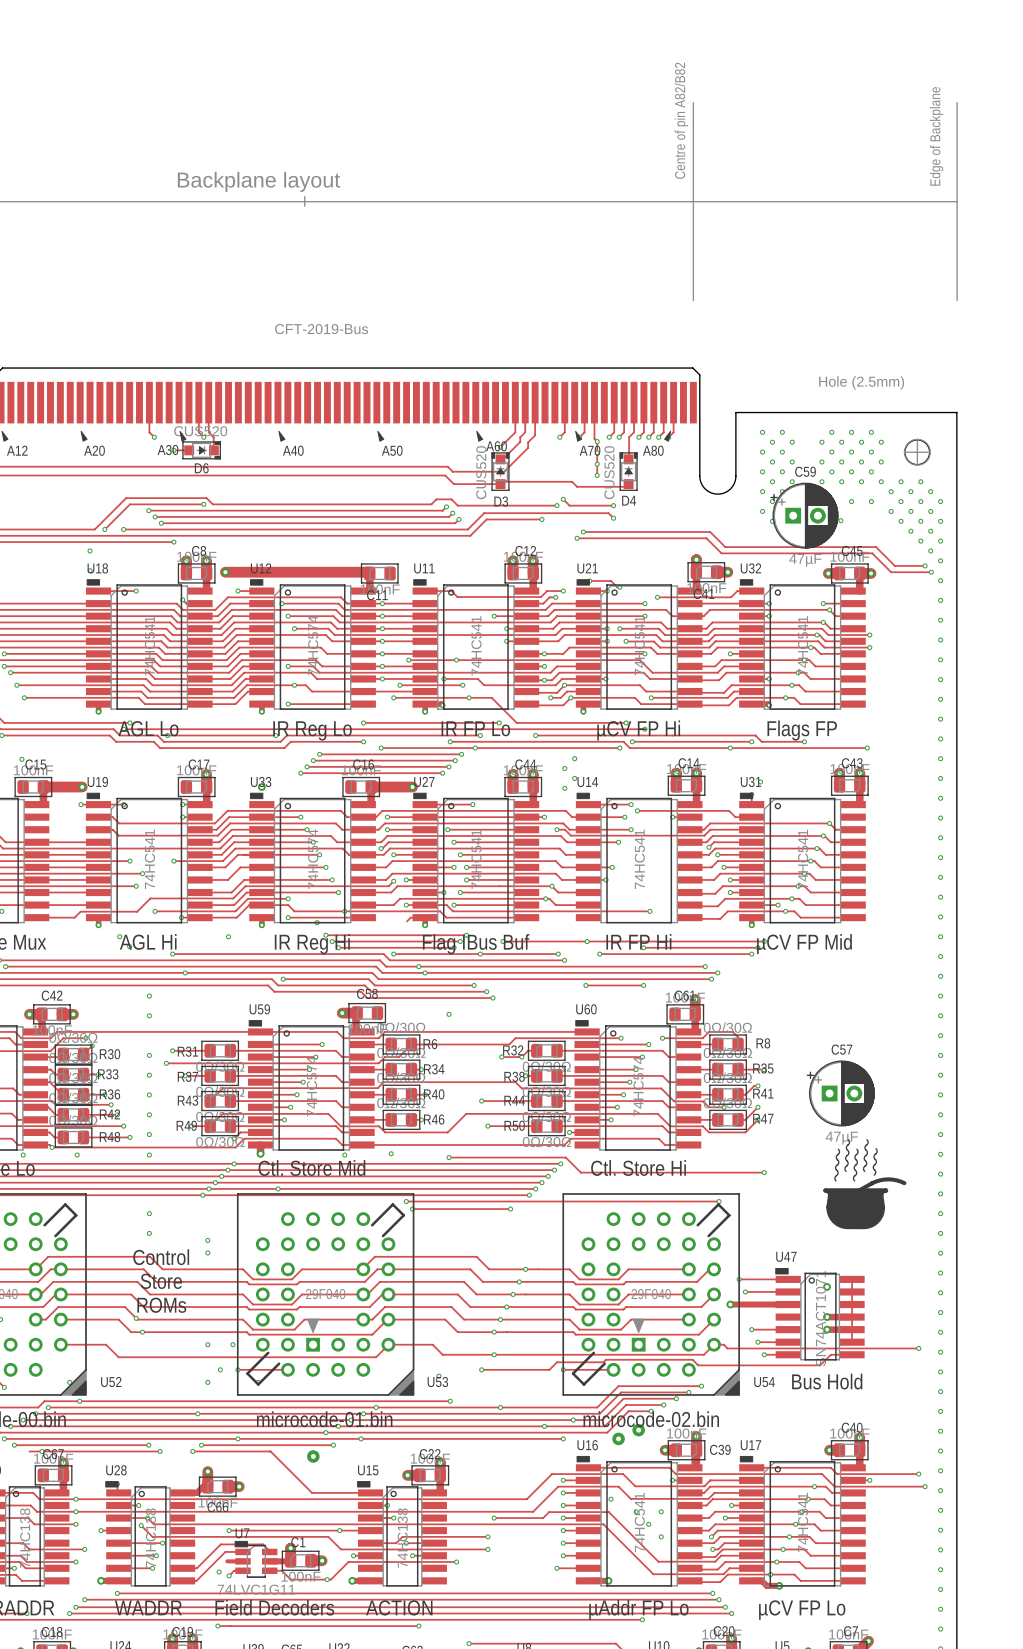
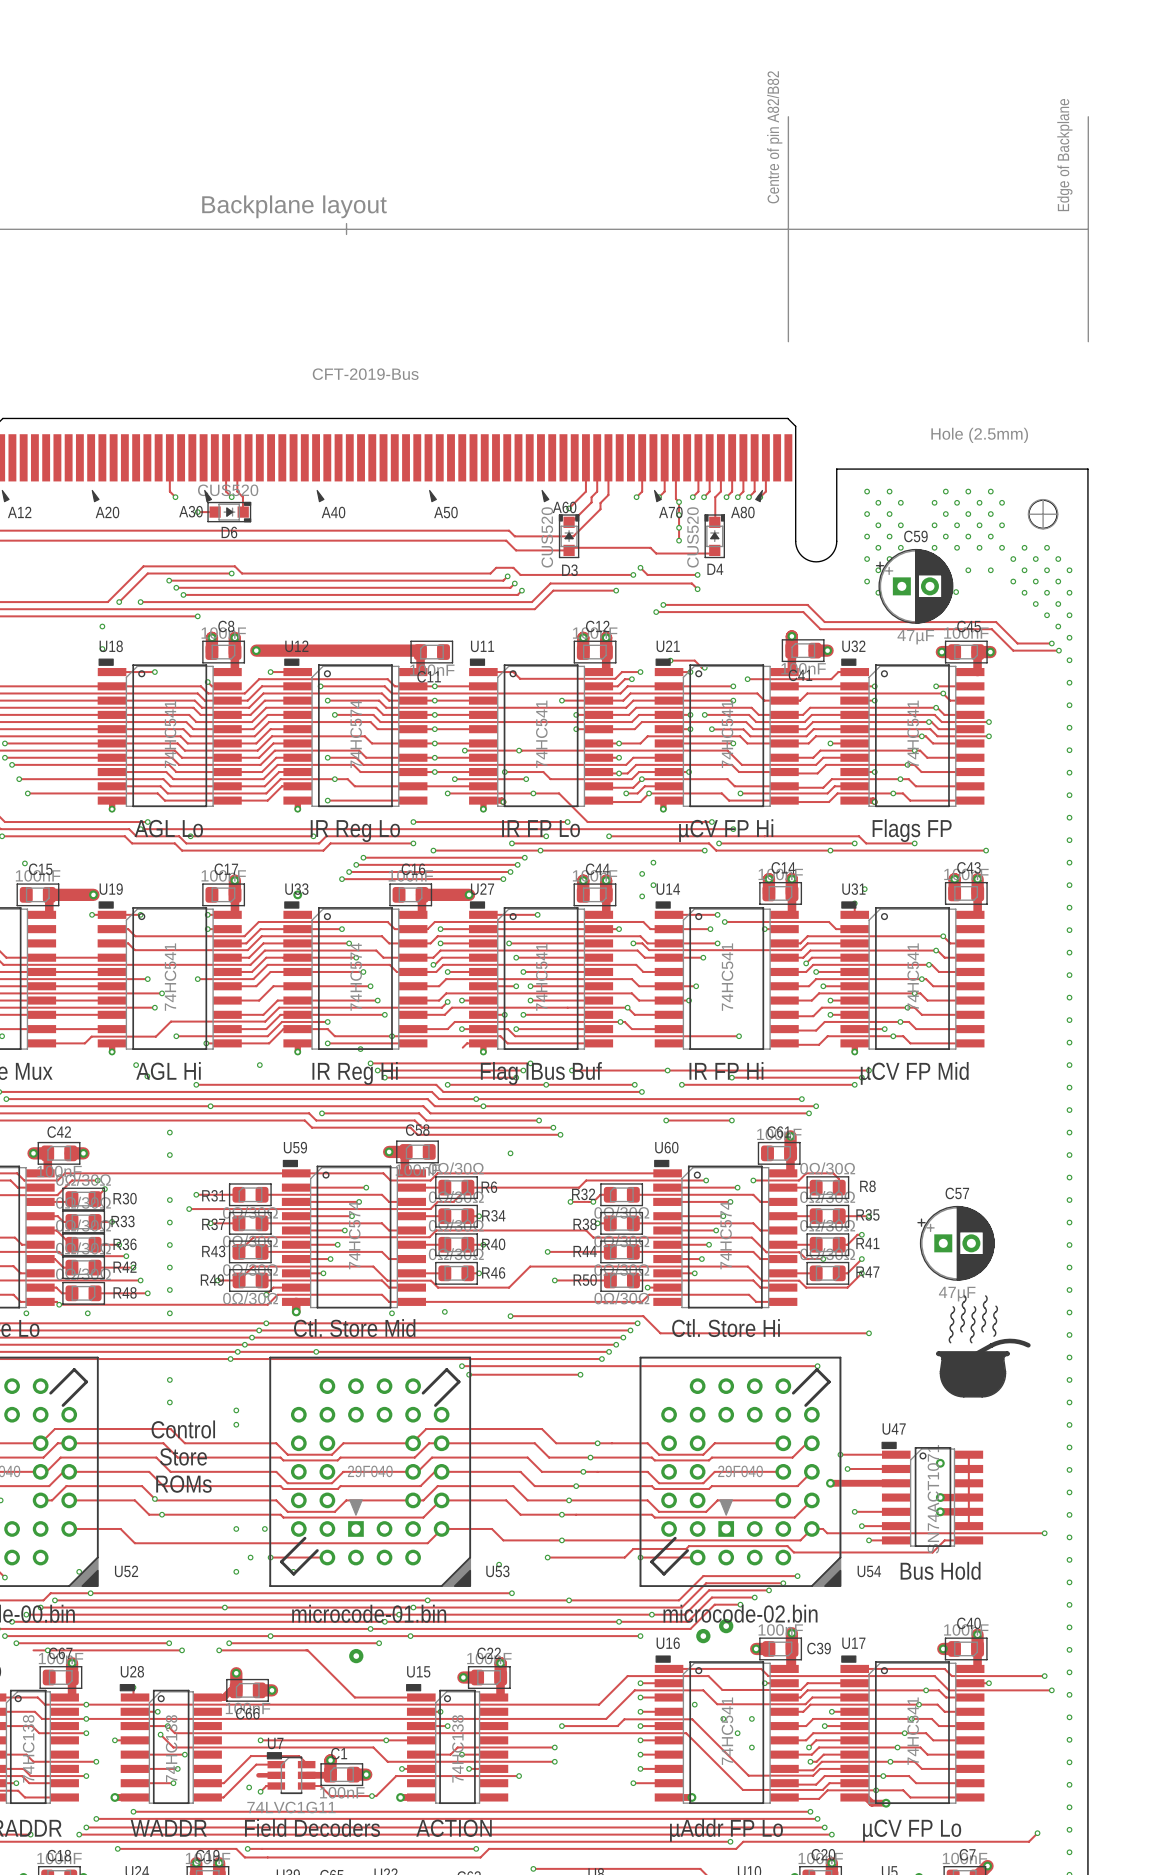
track: none -> (1037, 1833) (1028, 1841) (743, 1841) (736, 1848) (489, 1848) (480, 1857) (244, 1857) (236, 1848) (117, 1848)
via: none -> (1037, 1833)
via: none -> (117, 1848)

